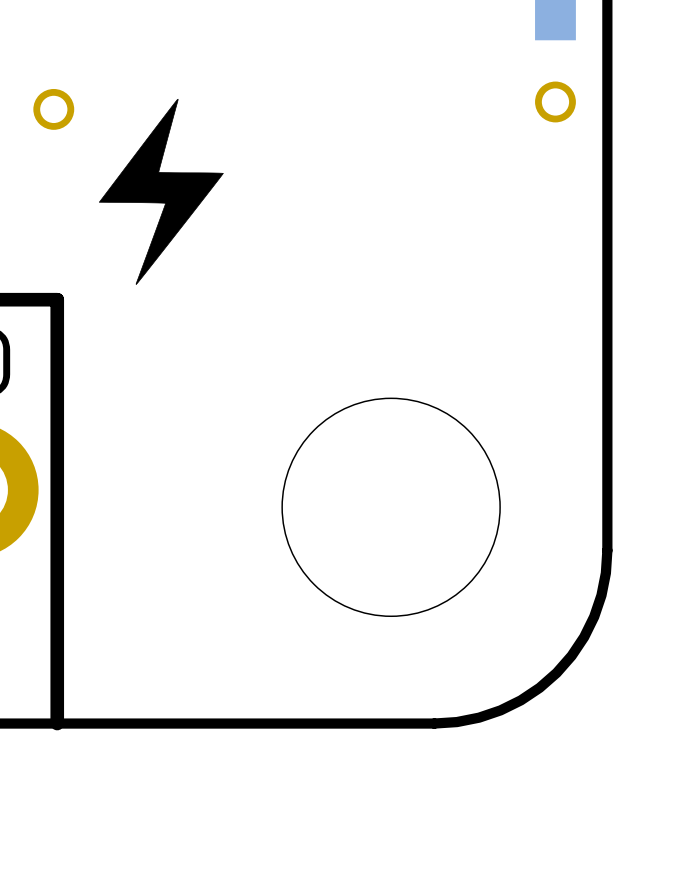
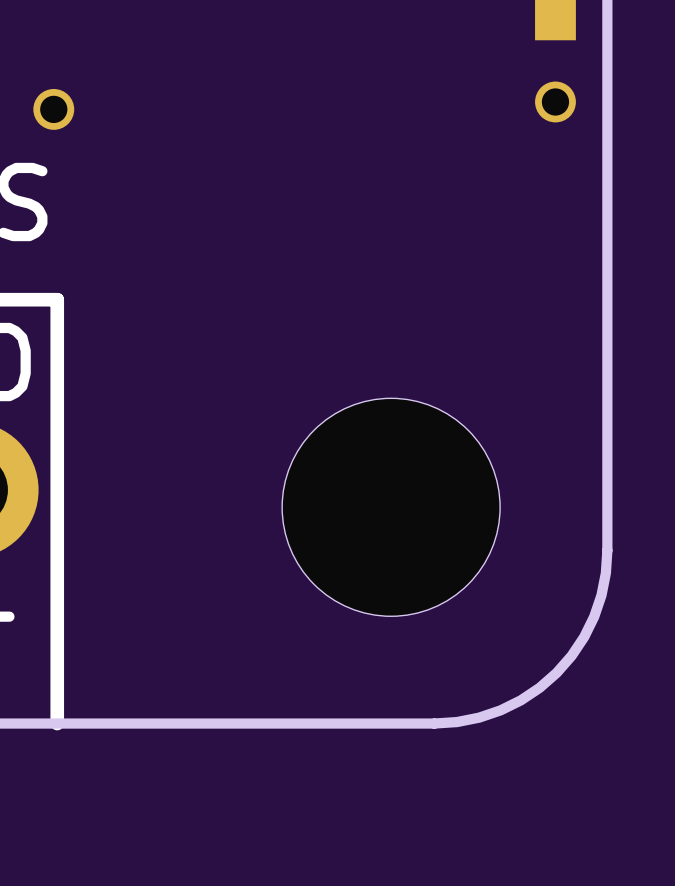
drawing: [98, 98, 224, 285] -> none

